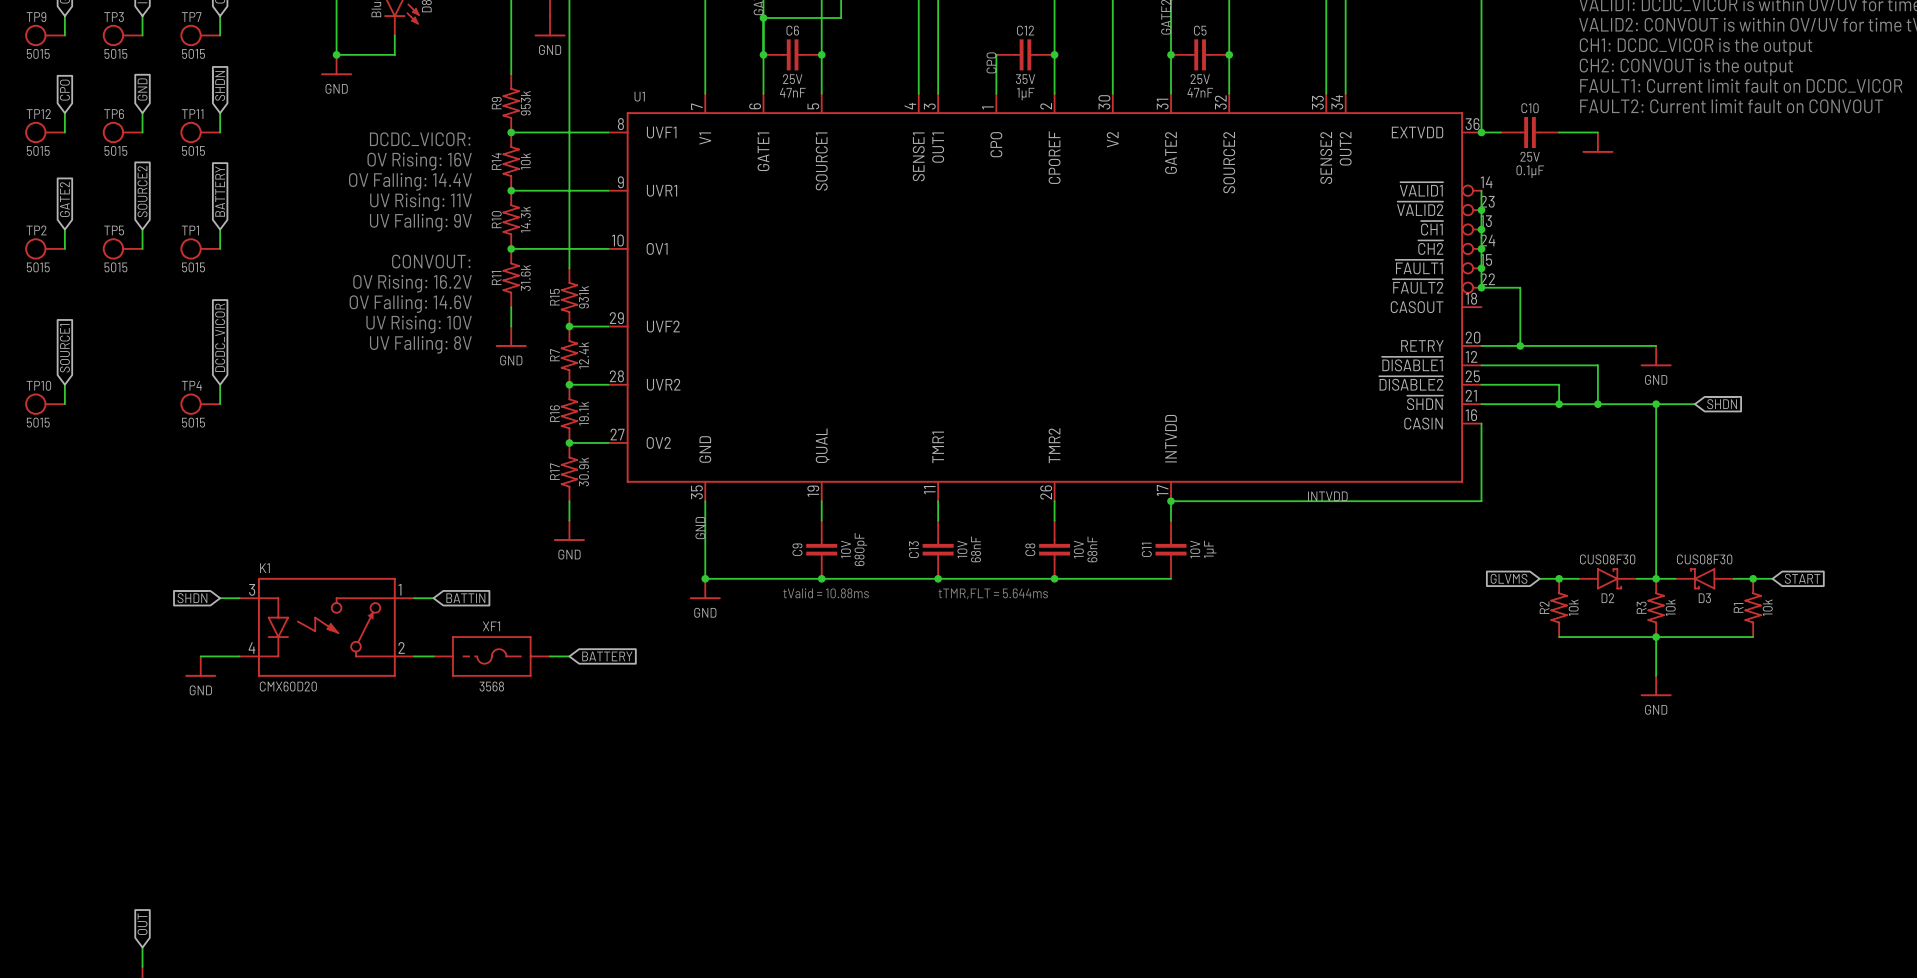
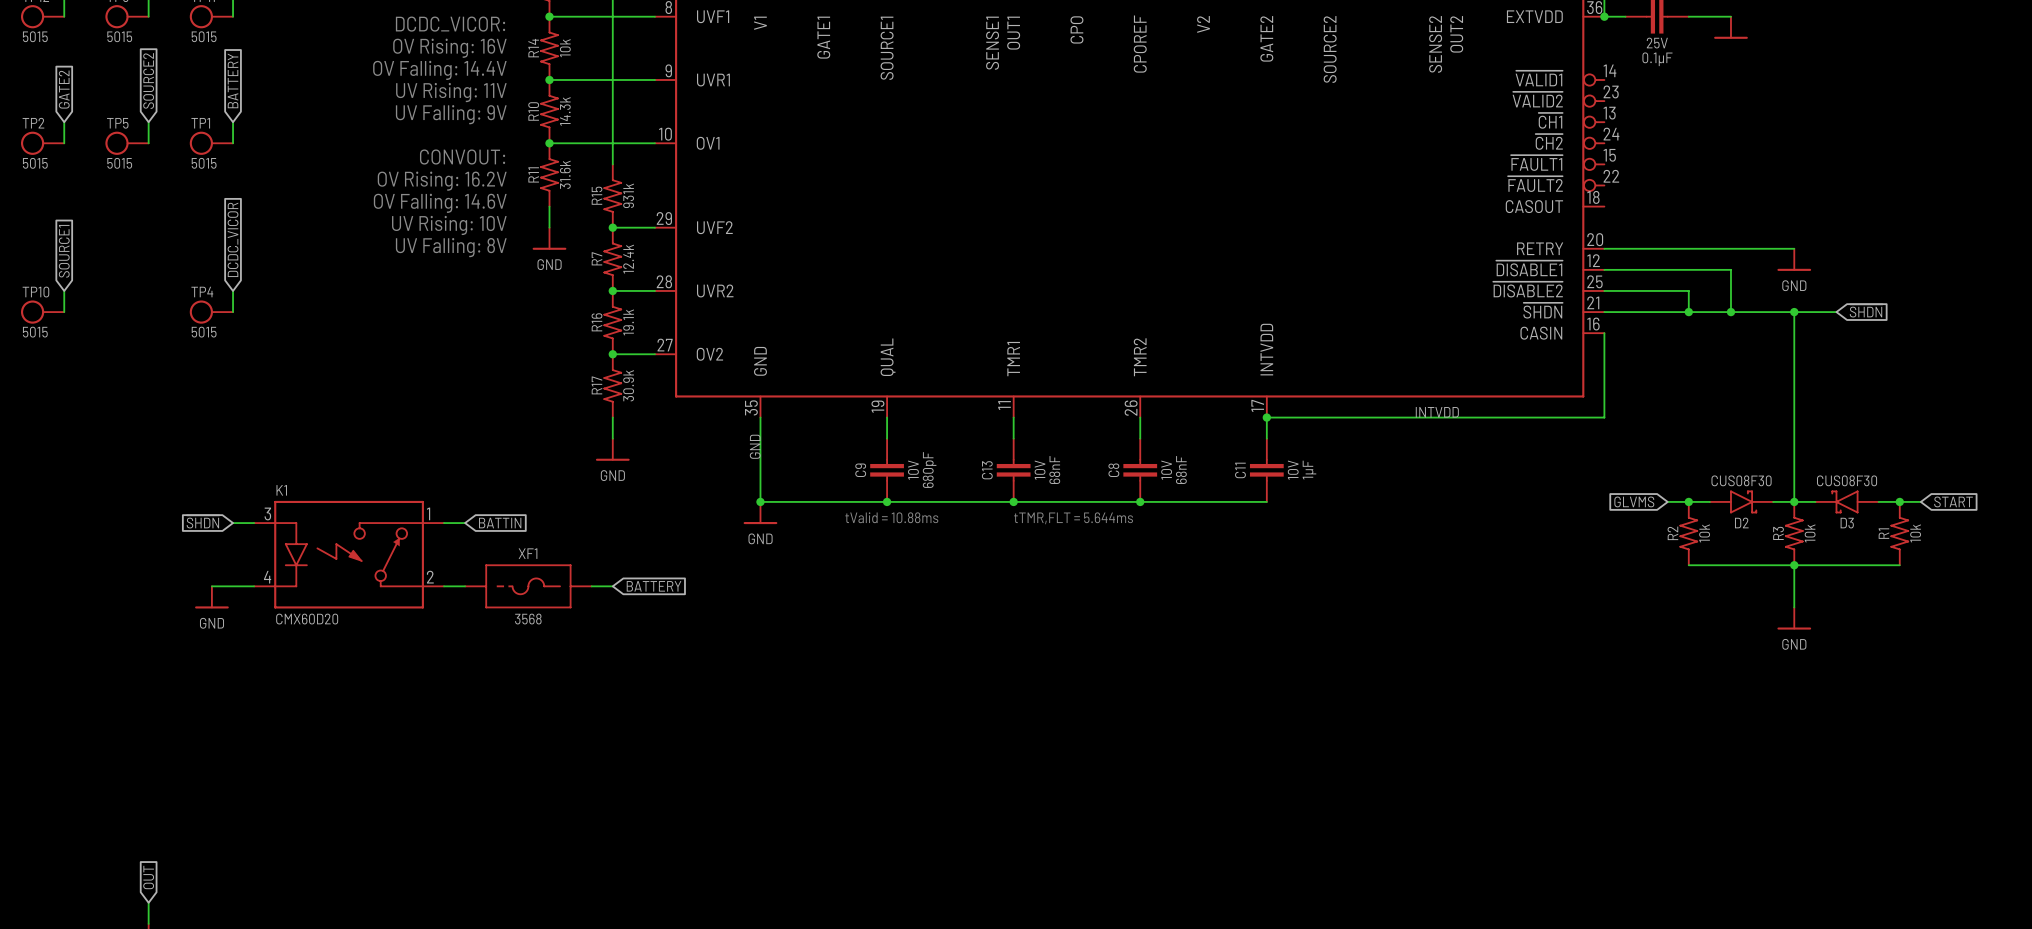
wire: (1481, 190) (1481, 287) (1520, 287) (1520, 345) -> none
junction: (1481, 210) -> none
junction: (1481, 229) -> none
junction: (1481, 248) -> none
junction: (1481, 268) -> none
junction: (1481, 287) -> none
junction: (1520, 345) -> none

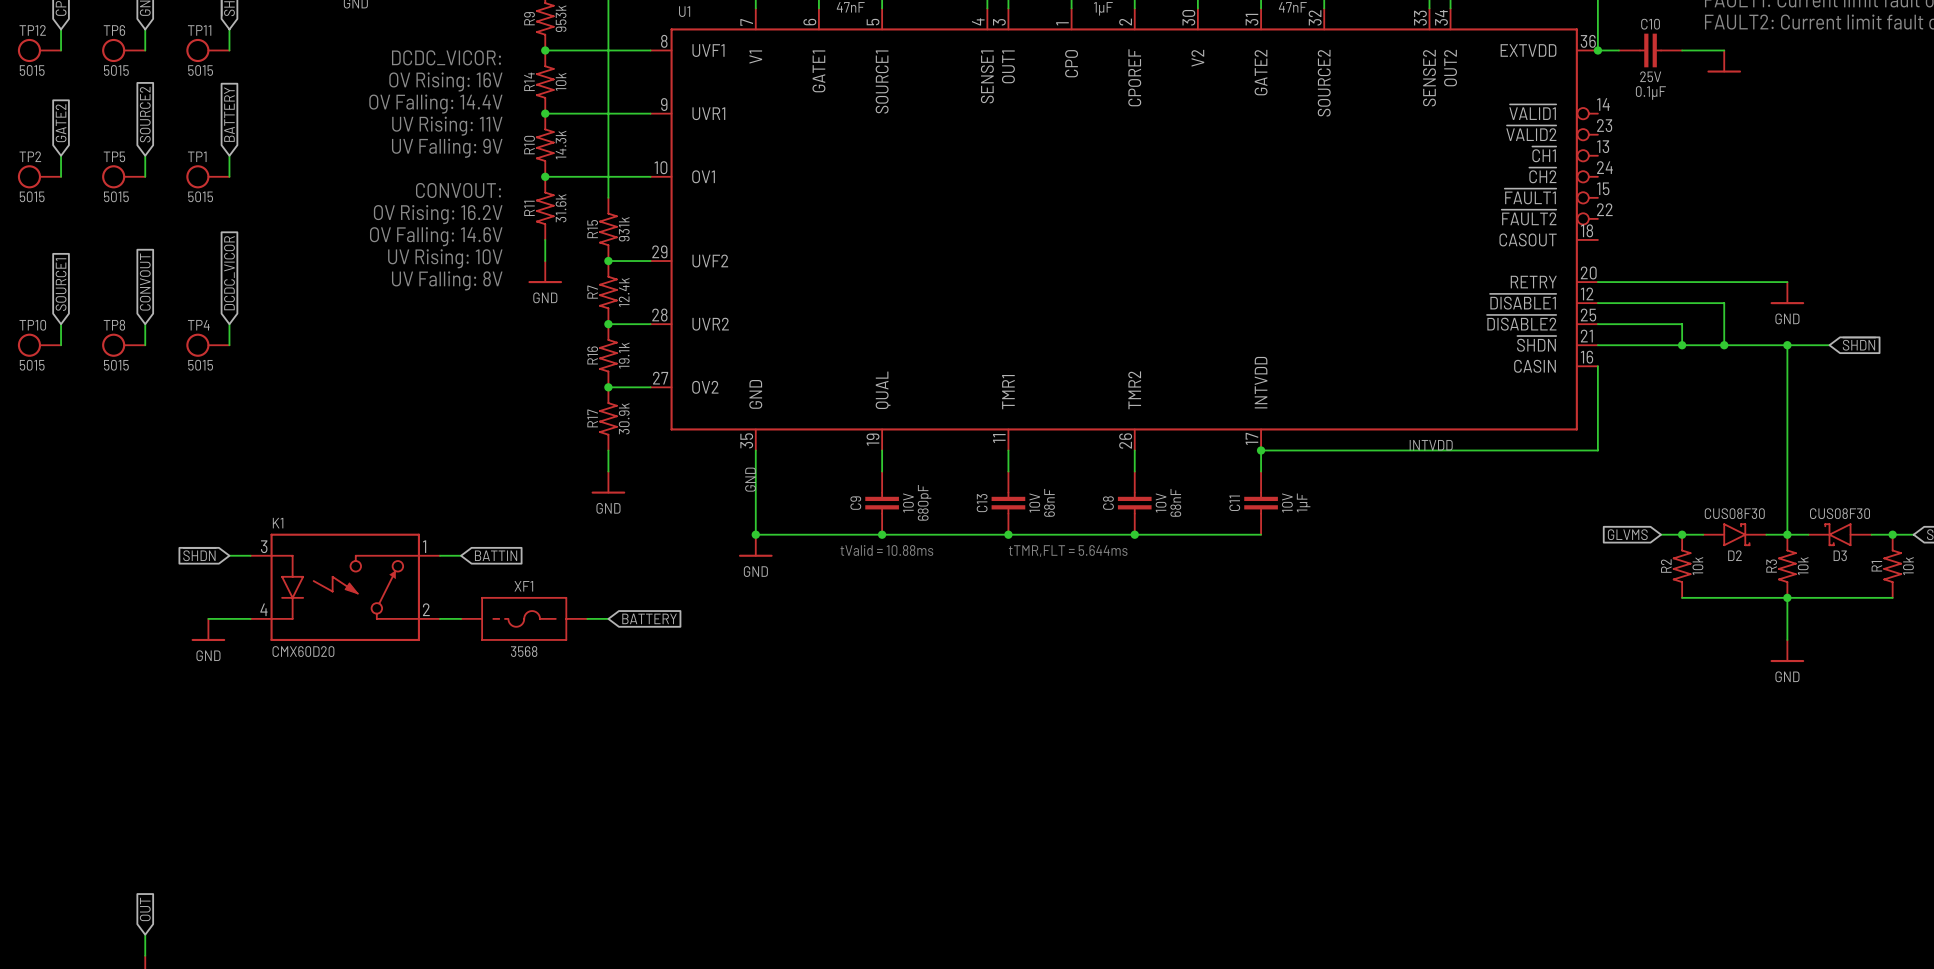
global label: none -> CONVOUT (145, 282)
wire: none -> (145, 324) (145, 345)
TP8: none -> (123, 345)

